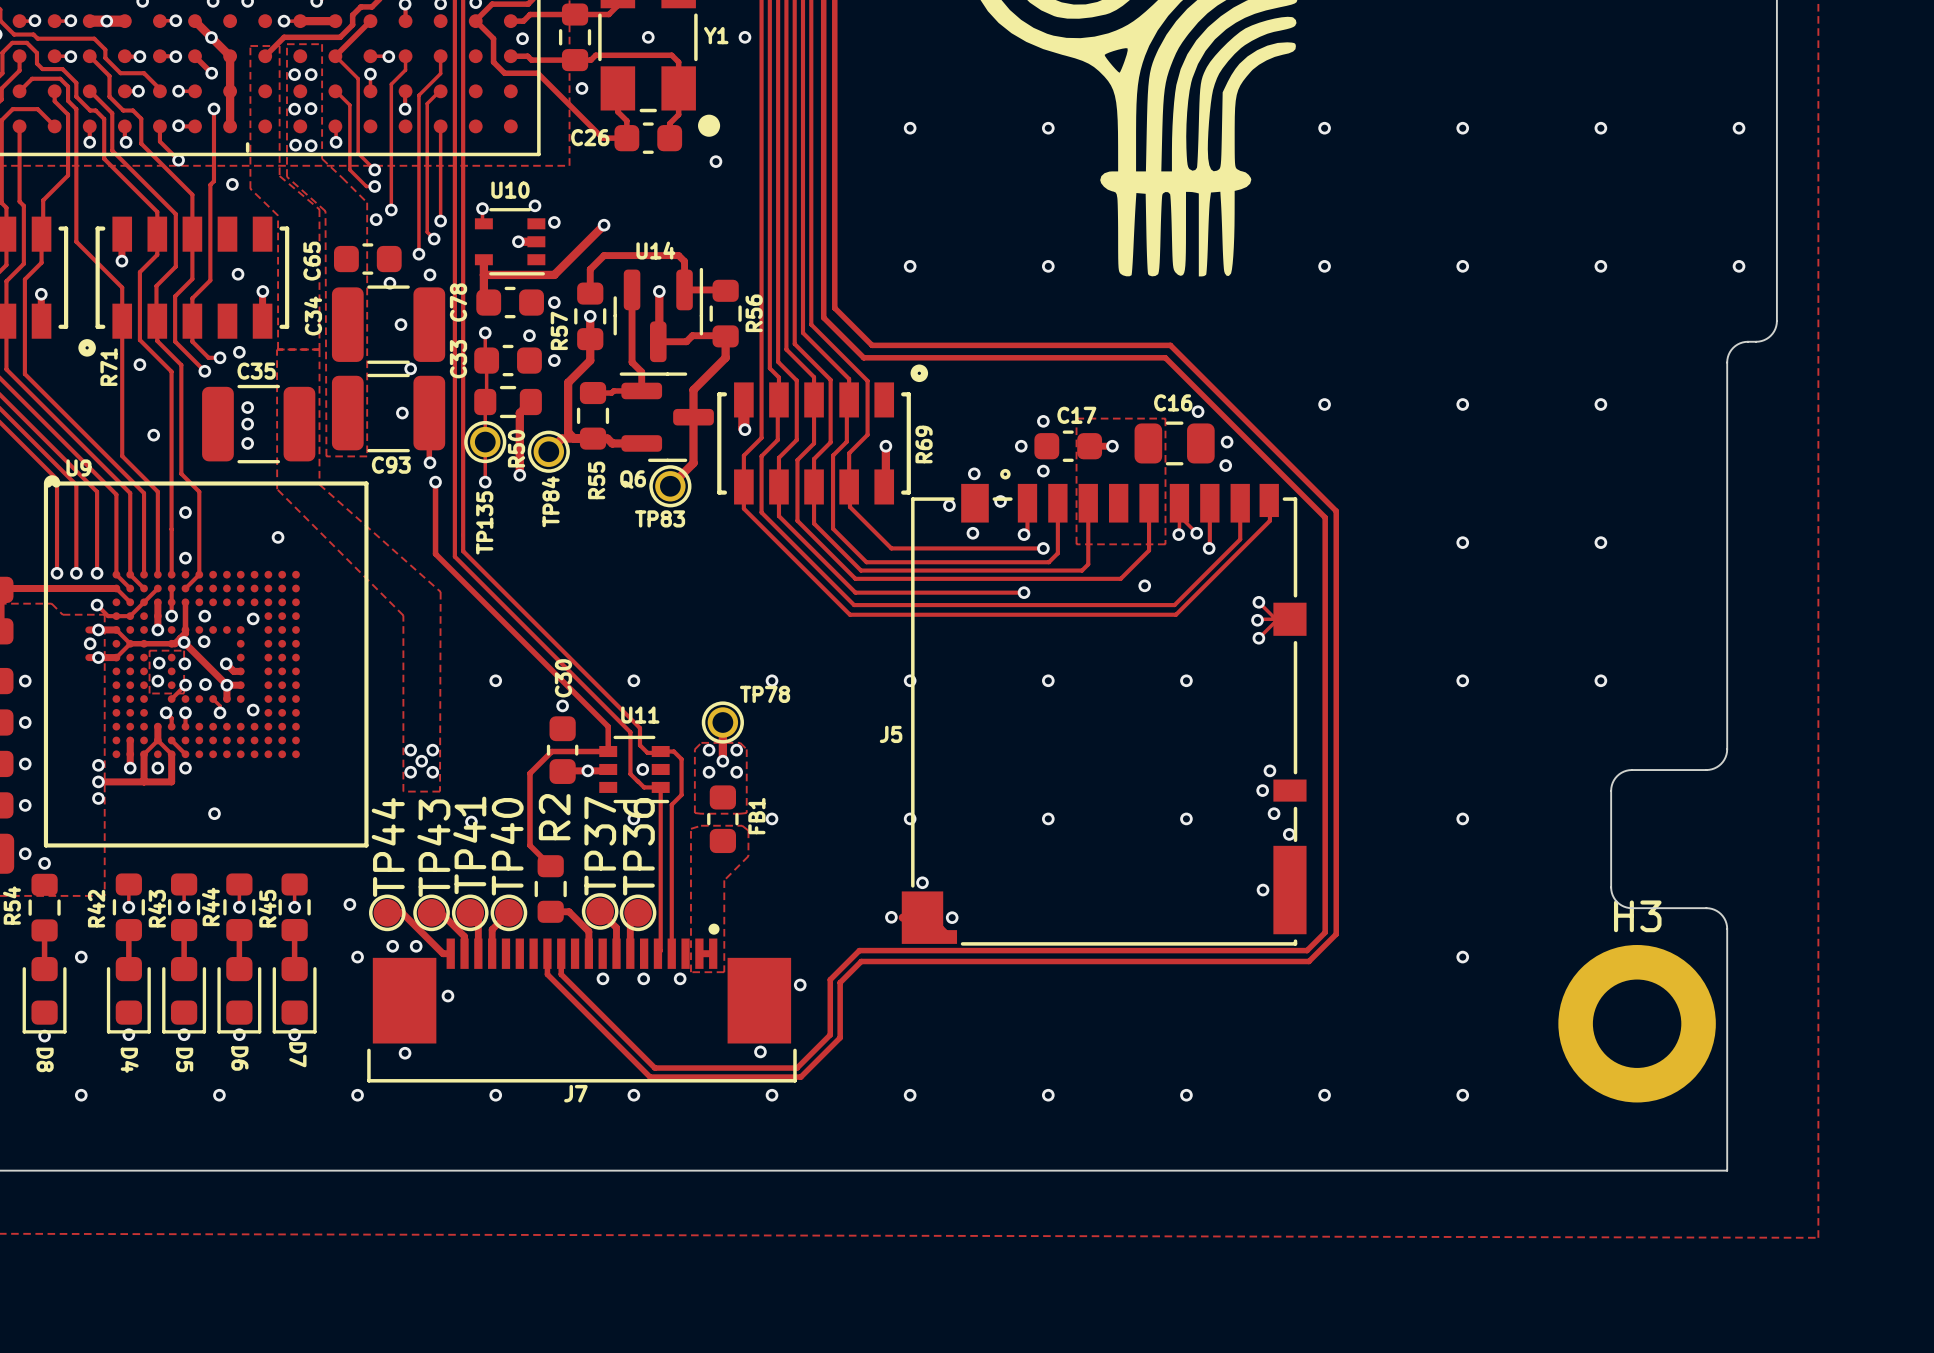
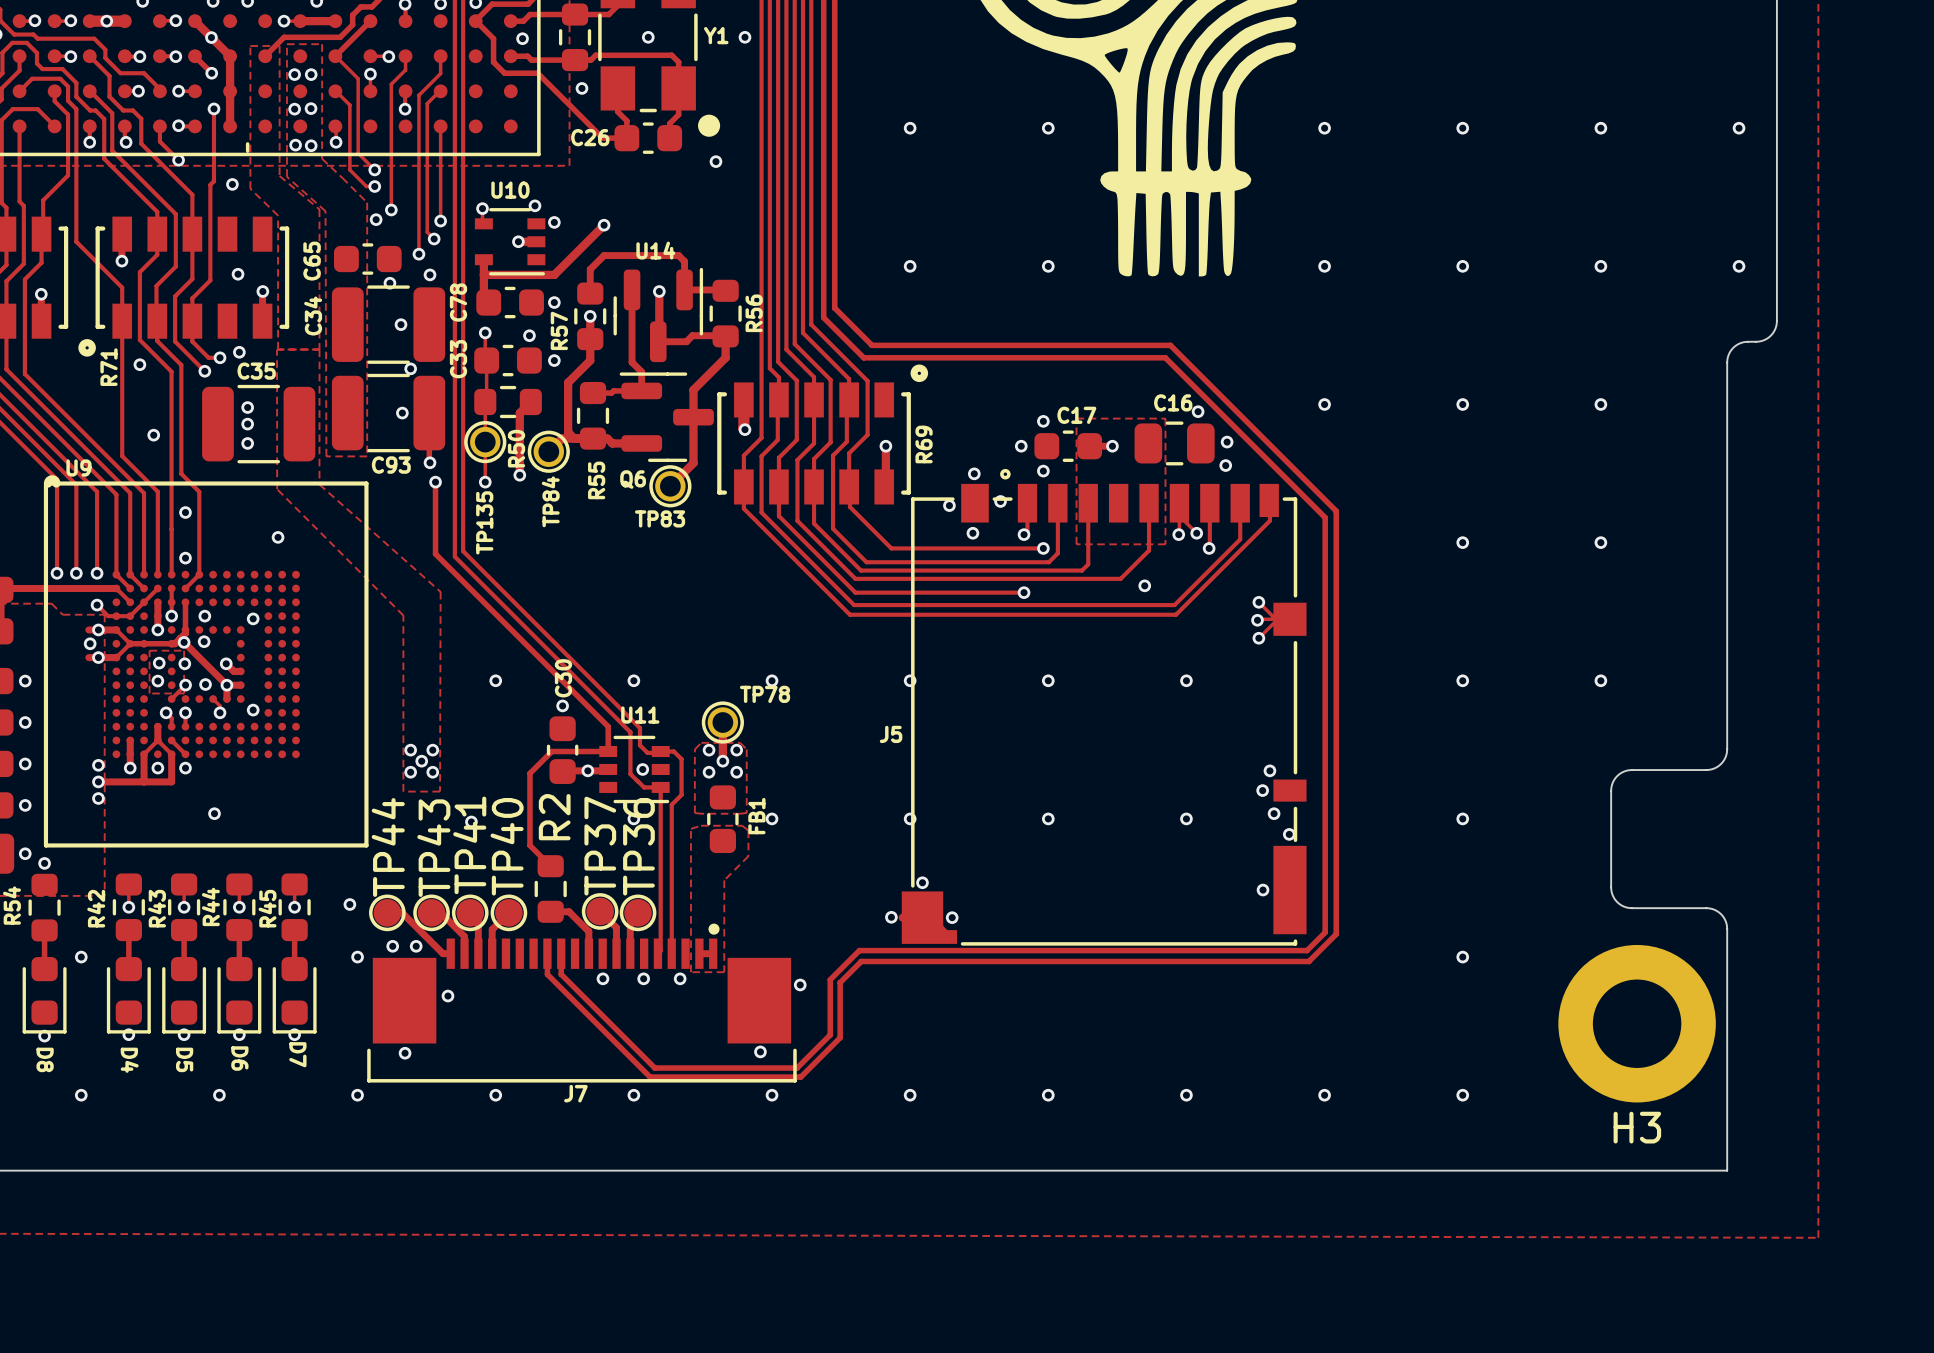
H3 name position: H3 (1637, 916) -> H3 (1637, 1127)

